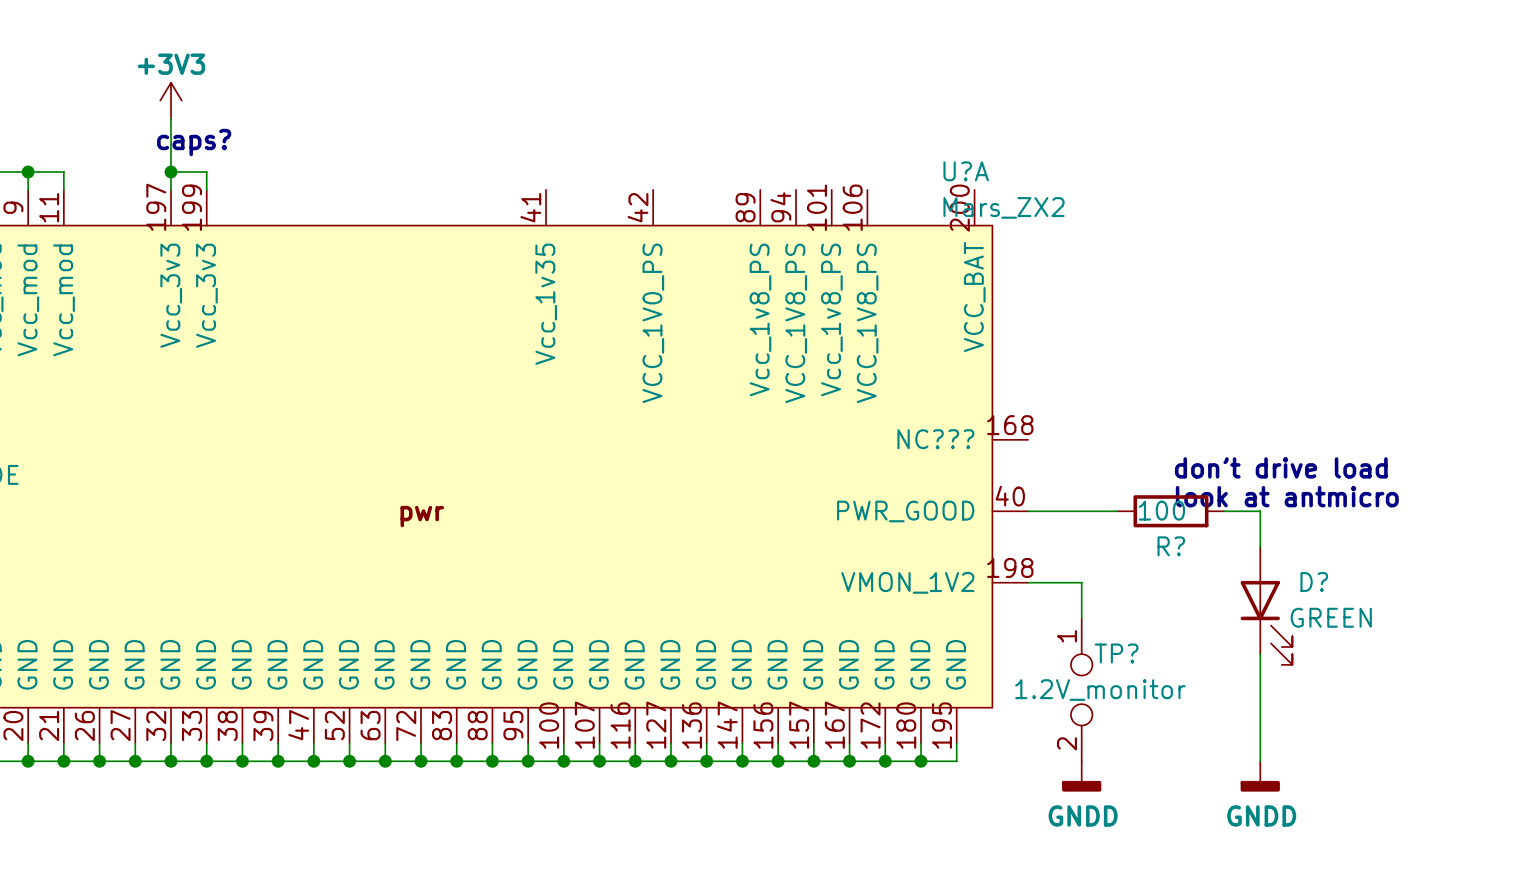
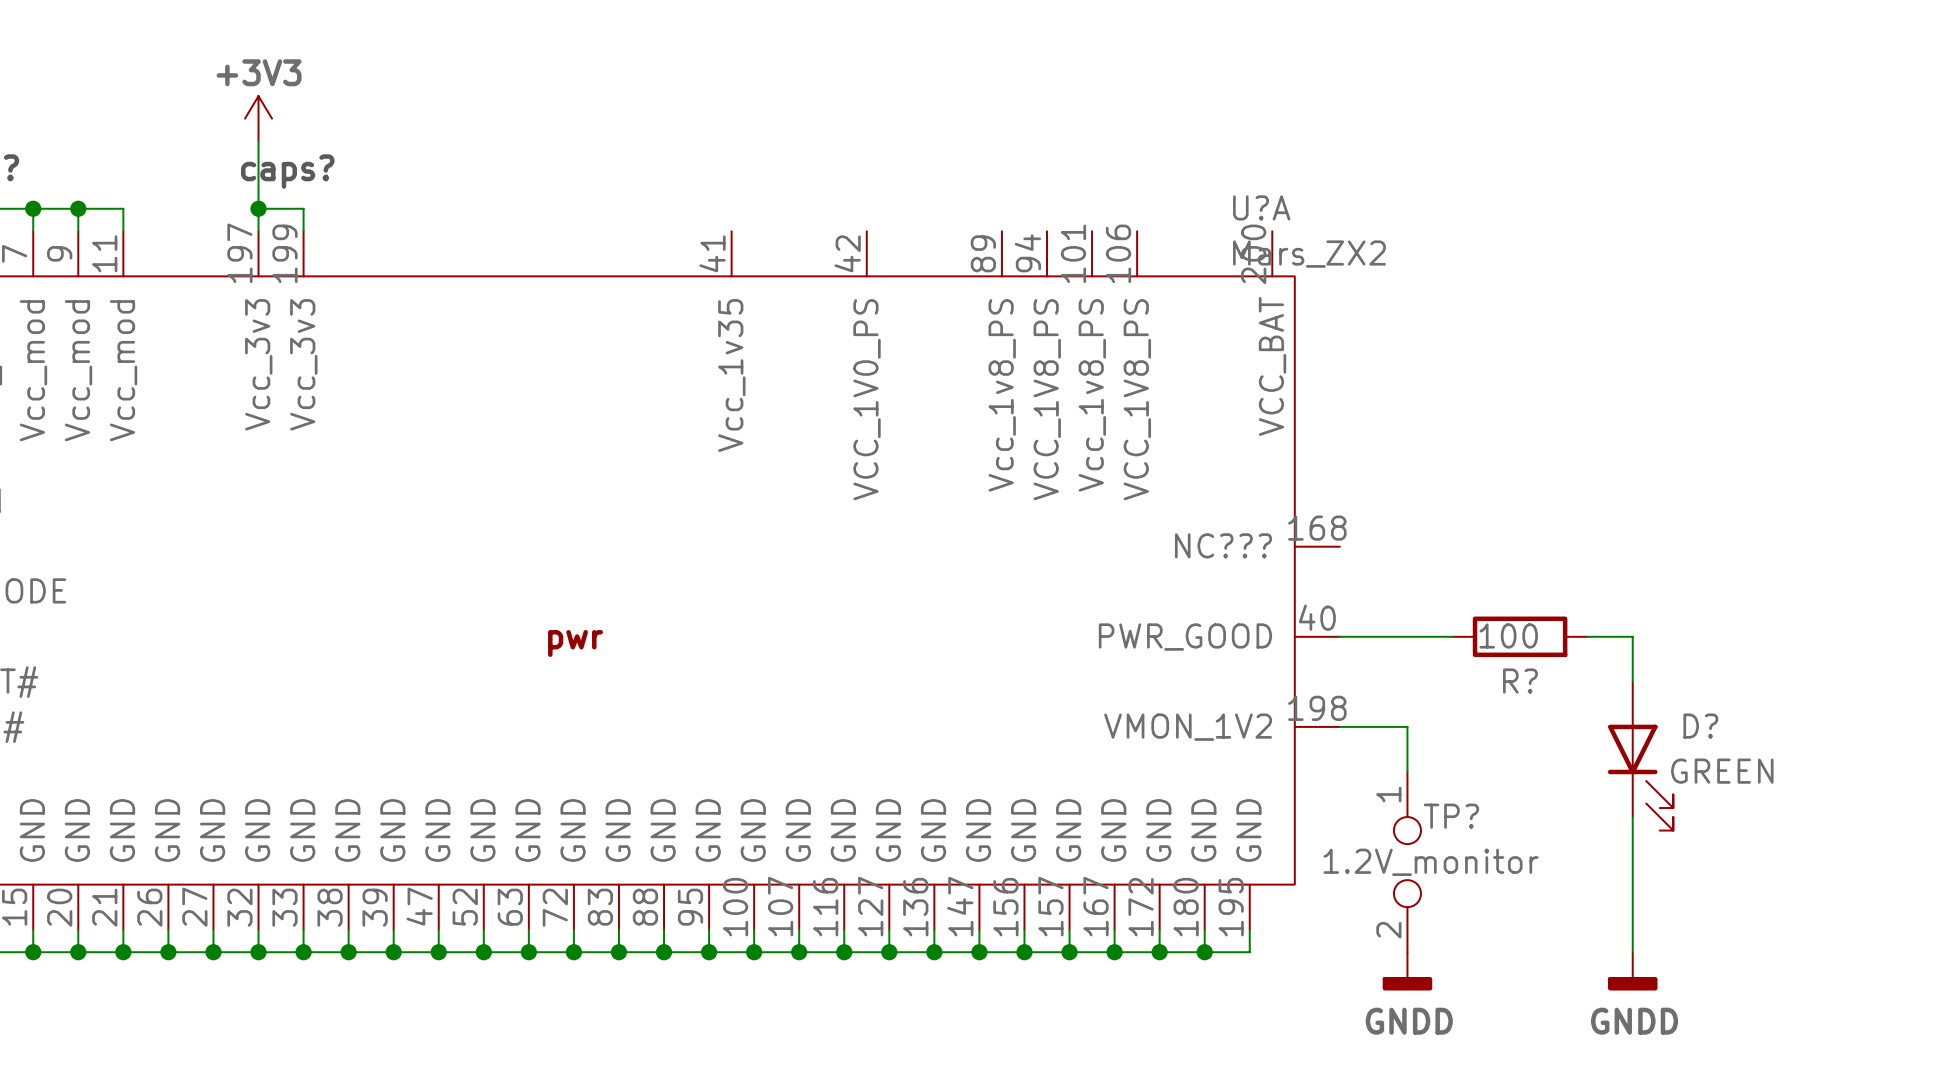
text: don’t drive load (1281, 467) -> none
text: look at antmicro (1287, 496) -> none

